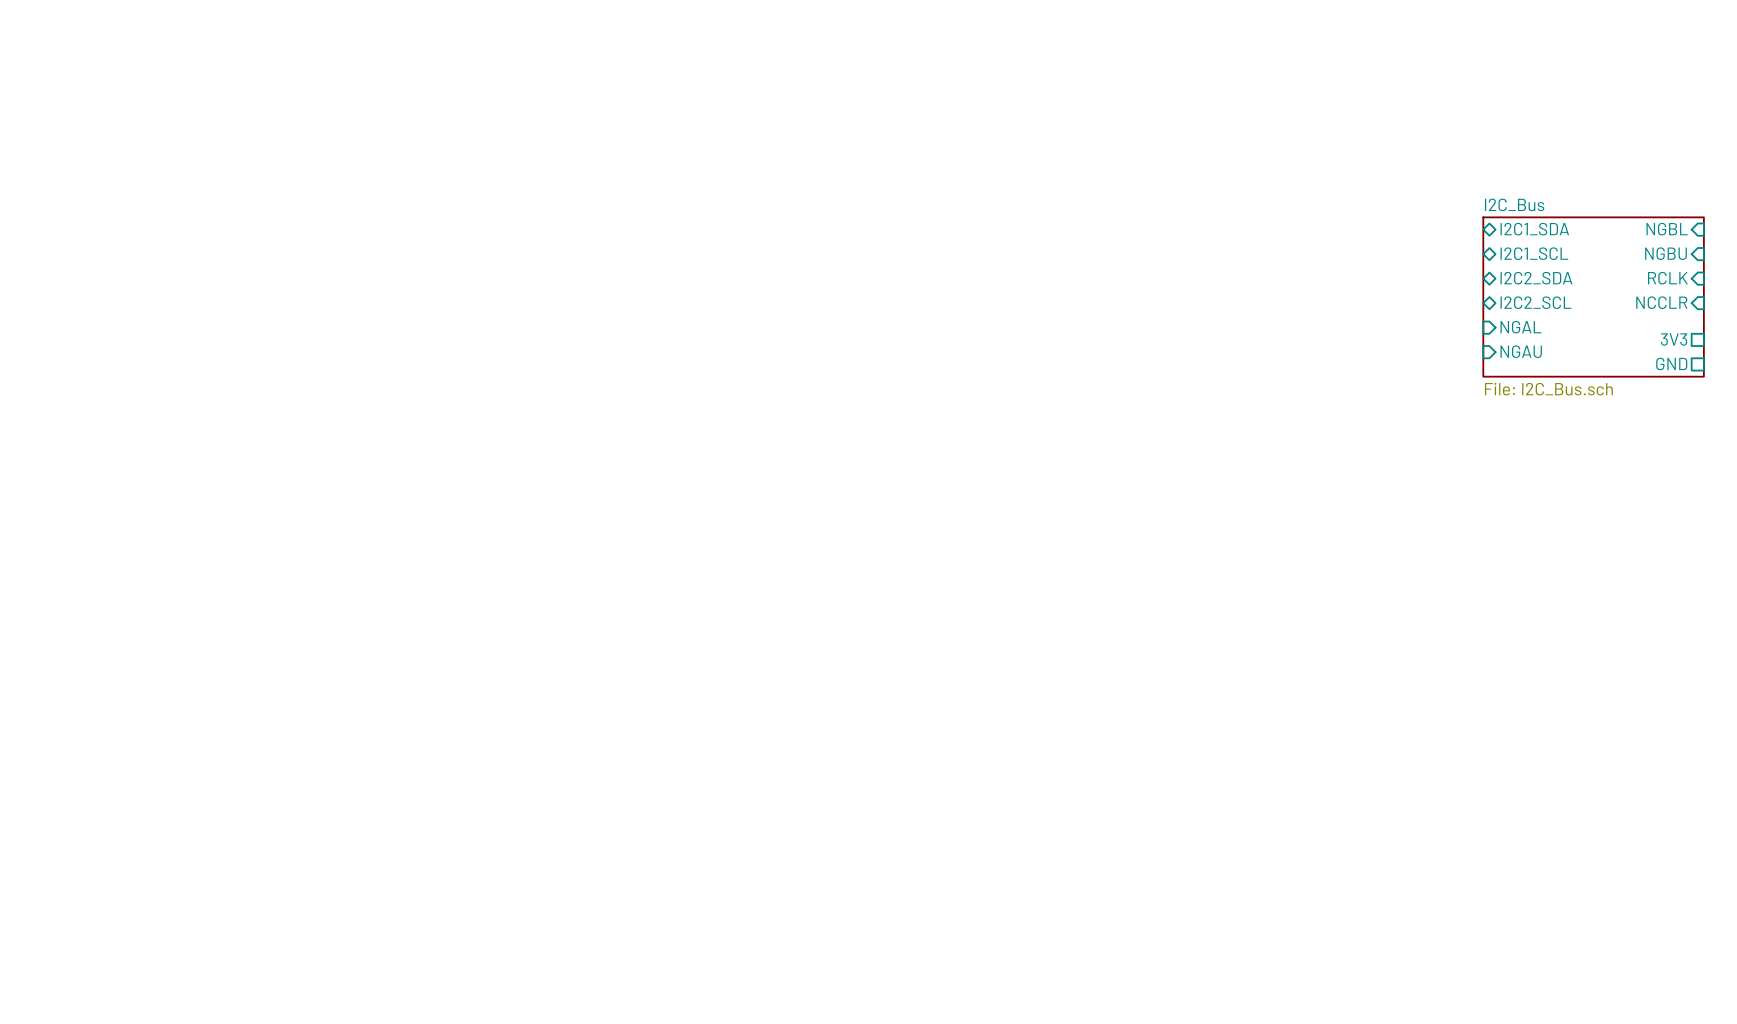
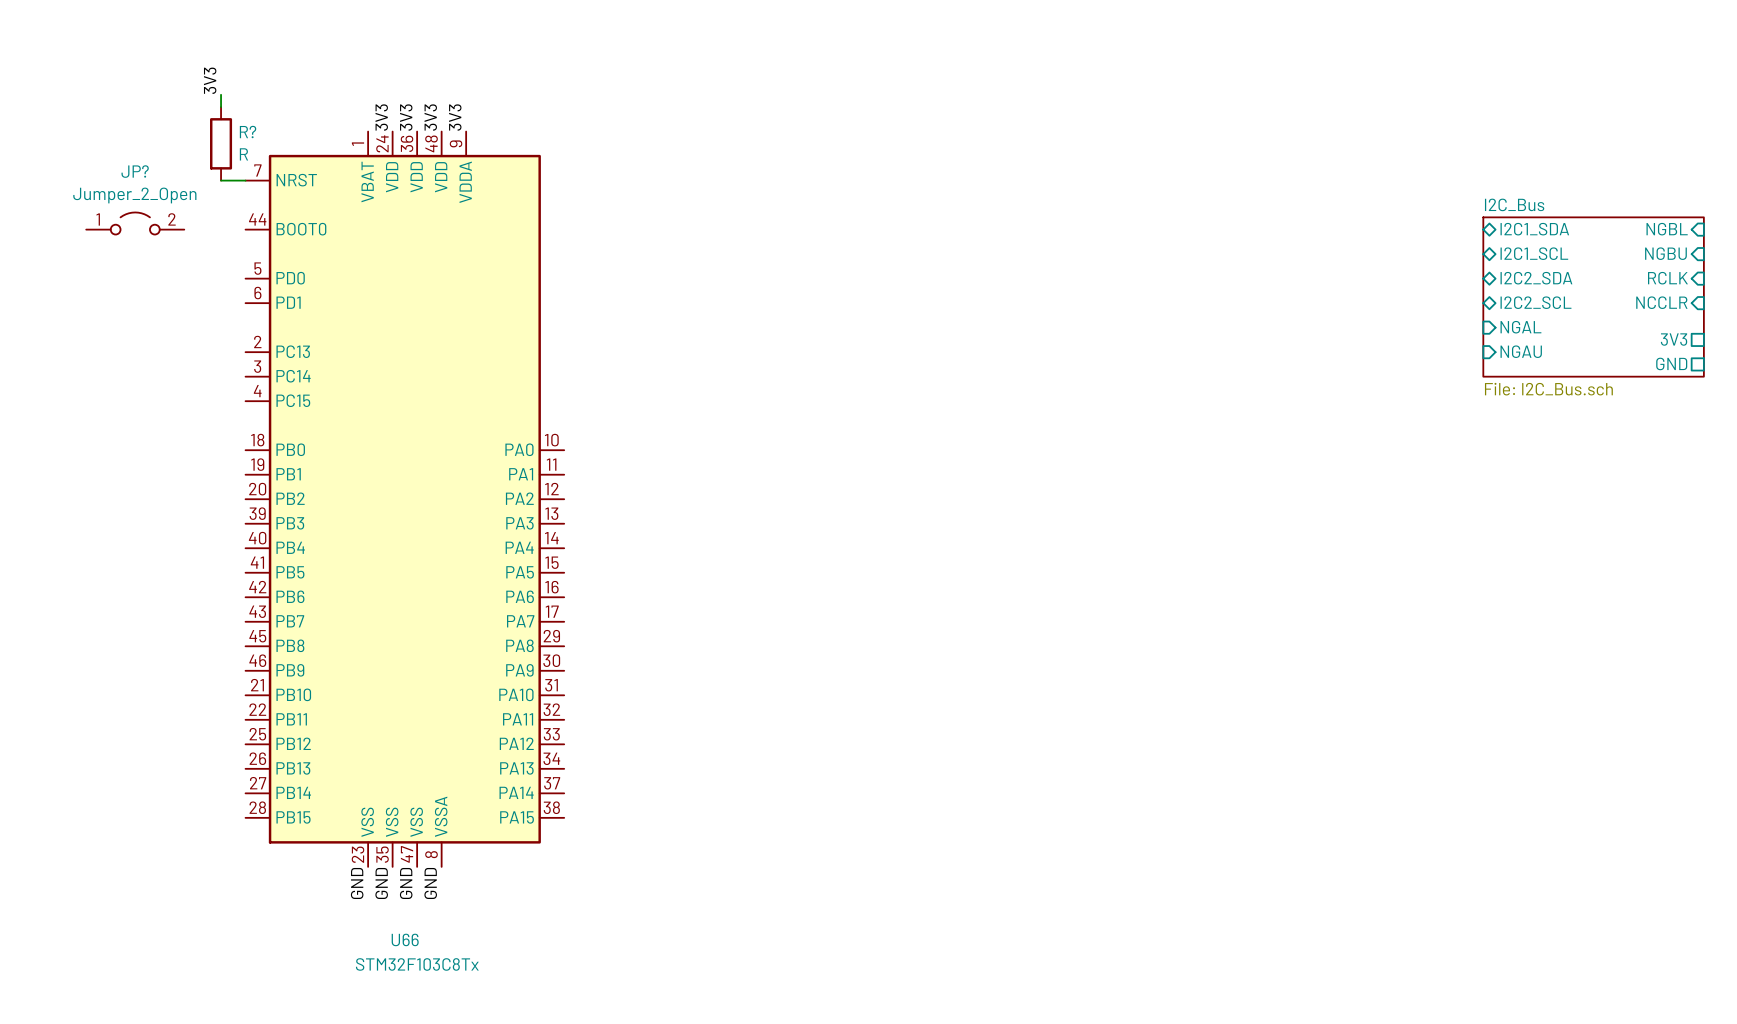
label: none -> 3V3 (210, 80)
wire: none -> (221, 94) (221, 107)
label: none -> 3V3 (381, 117)
label: none -> 3V3 (406, 117)
label: none -> 3V3 (430, 117)
label: none -> 3V3 (455, 117)
R?: none -> R (221, 143)
wire: none -> (221, 180) (245, 180)
JP?: none -> Jumper_2_Open (135, 223)
U66: none -> STM32F103C8Tx (404, 499)
label: none -> GND (357, 883)
label: none -> GND (381, 883)
label: none -> GND (406, 883)
label: none -> GND (430, 883)

